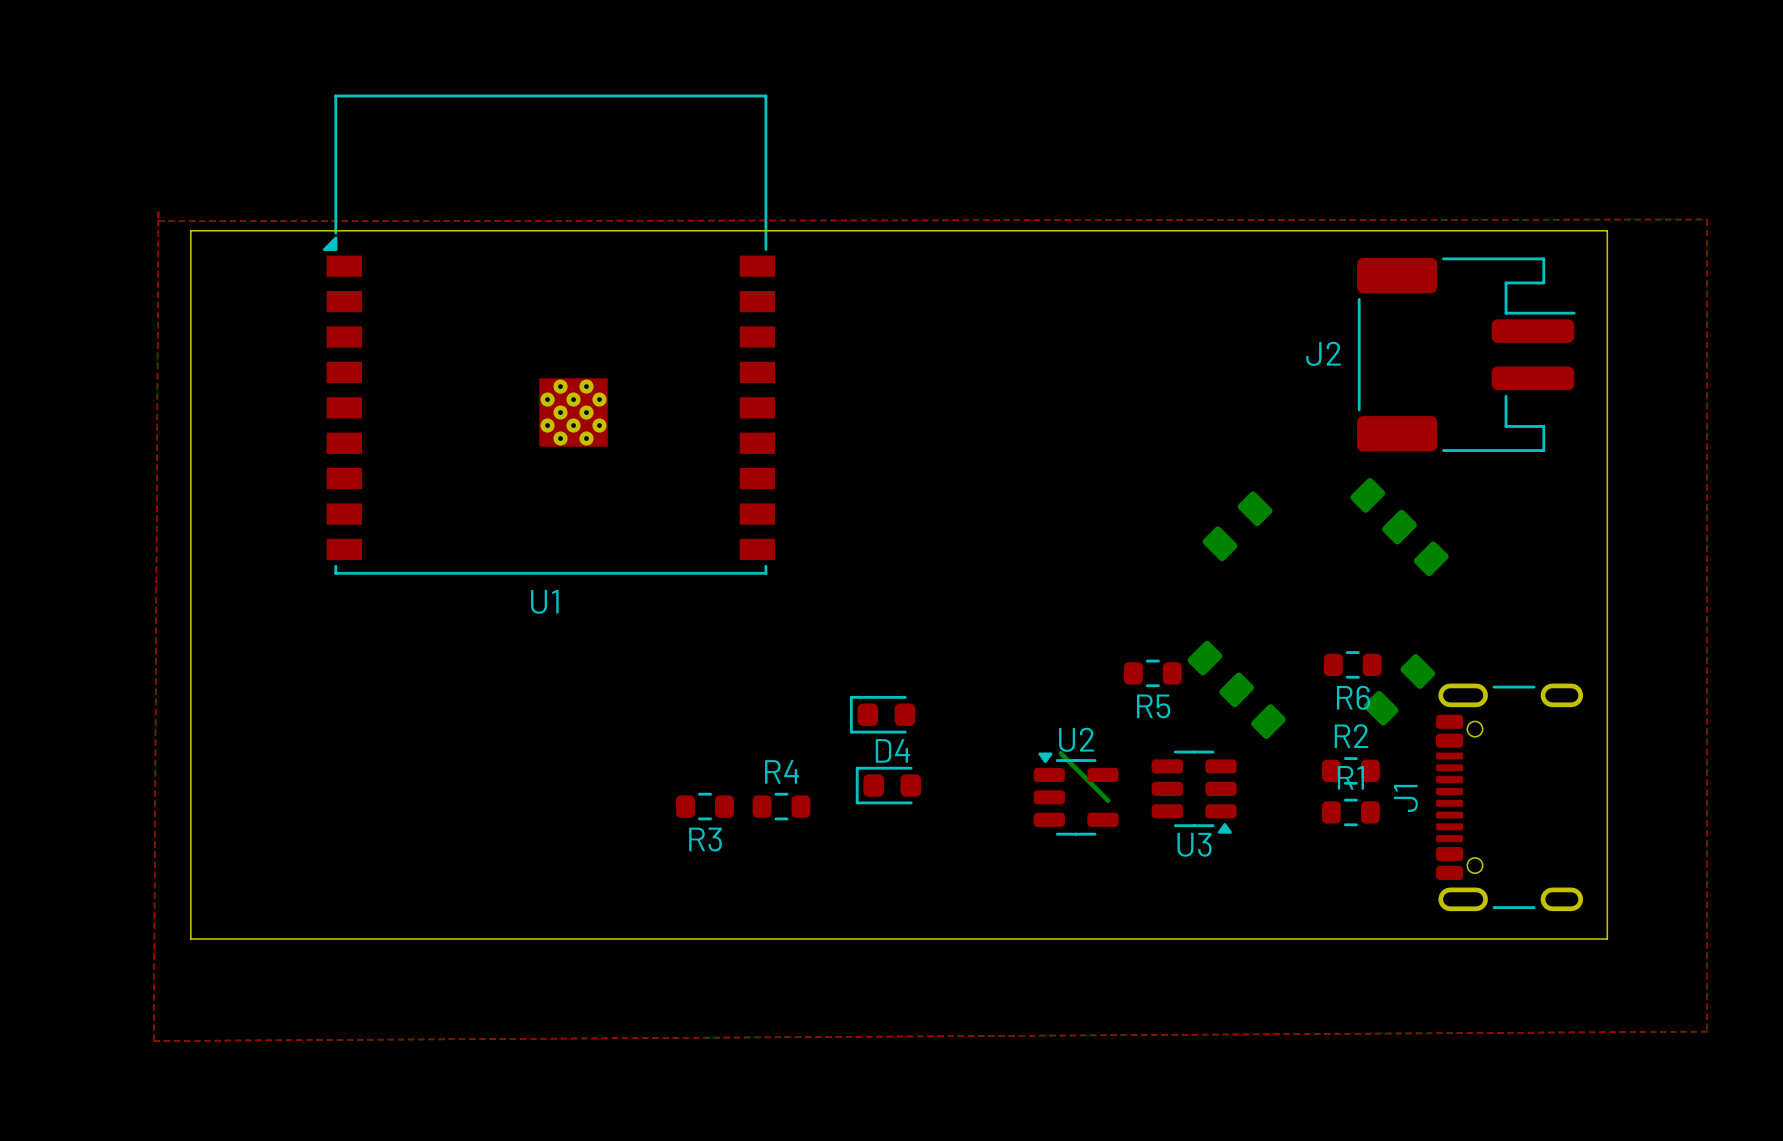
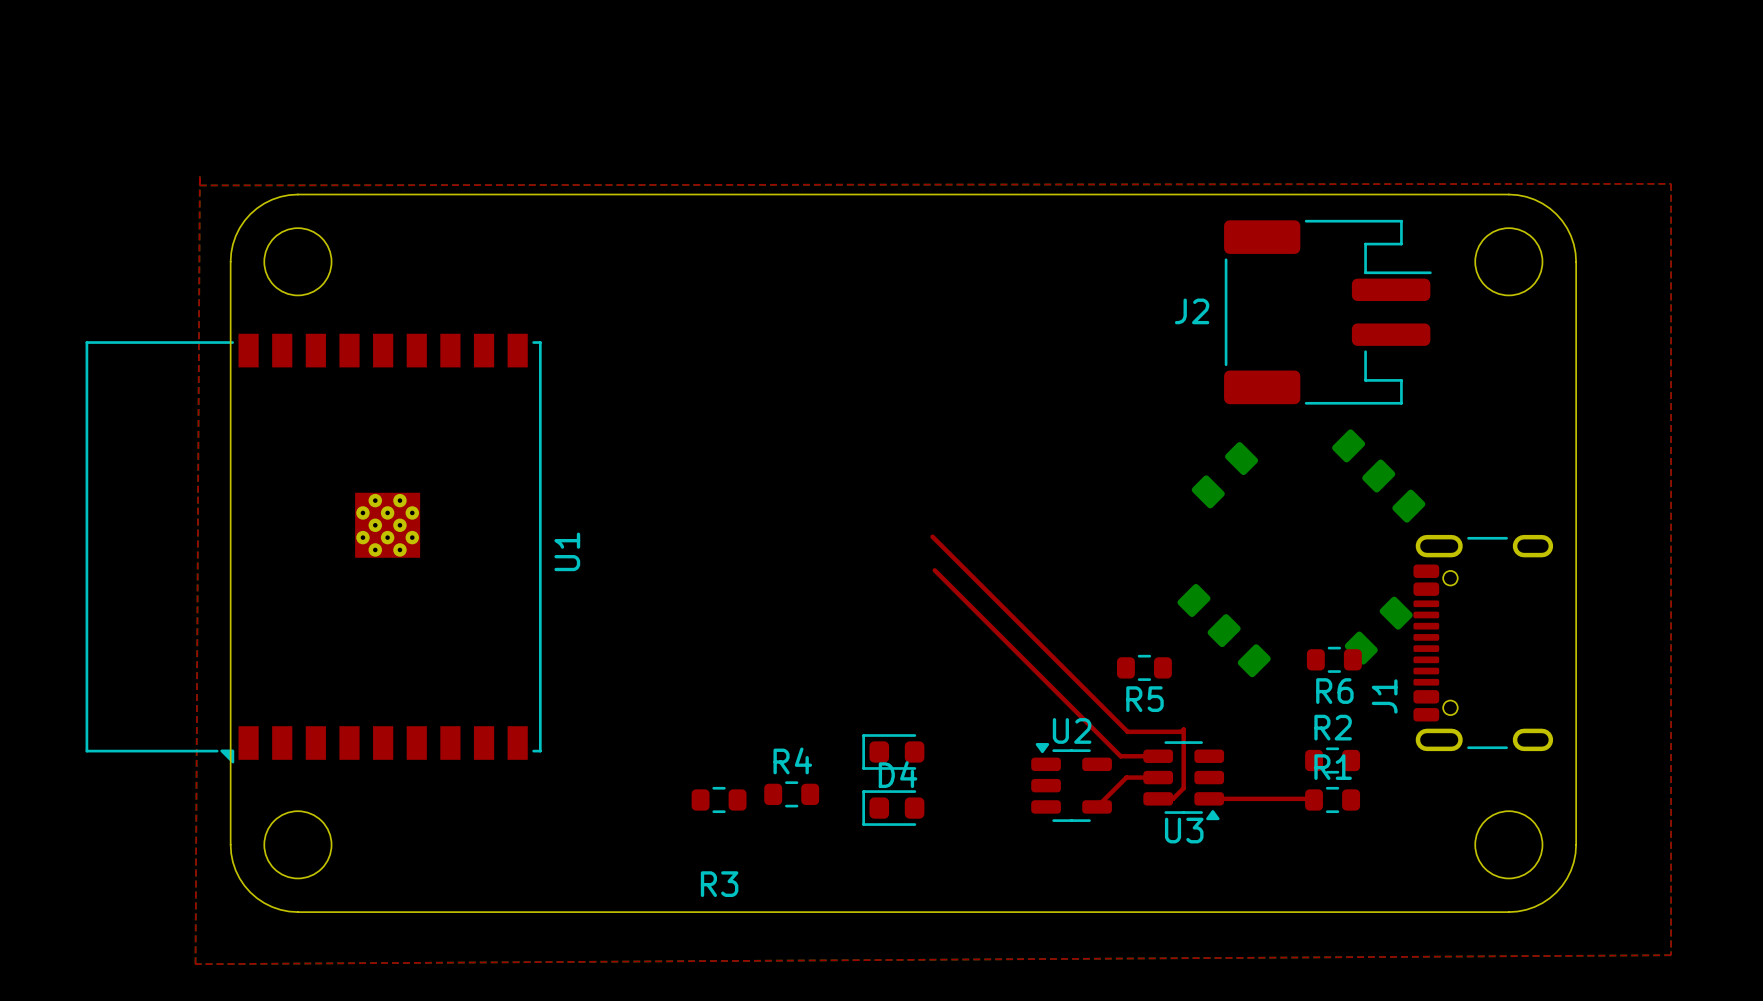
board edge: (261, 230) (190, 230) (190, 301) -> (297, 194) (272, 199) (250, 214) (235, 236) (230, 261)
board edge: (1536, 230) (1607, 230) (1607, 301) -> (1508, 194) (1534, 199) (1556, 214) (1571, 236) (1576, 261)
round board edge: none -> [263, 227, 333, 296]
round board edge: none -> [1474, 227, 1544, 296]
U1 rotation: 0° (548, 334) -> 90° counterclockwise (313, 548)
U1 position: (548, 334) -> (313, 548)
J2 position: (1466, 354) -> (1327, 312)
top track: none -> (932, 536) (1127, 731) (1181, 731) (1183, 729) (1183, 788) (1173, 798) (1158, 798)
top track: none -> (934, 570) (1120, 756) (1158, 756)
R6 position: (1352, 664) -> (1334, 659)
R5 position: (1152, 673) -> (1144, 667)
part position: (882, 714) -> (893, 751)
bottom track: (1060, 753) (1108, 800) -> none
R2 position: (1350, 770) -> (1332, 760)
D4 position: (888, 785) -> (893, 808)
U3 position: (1194, 792) -> (1183, 780)
U2 position: (1076, 794) -> (1071, 782)
J1 position: (1509, 797) -> (1483, 643)
J1 name position: J1 (1405, 798) -> J1 (1384, 696)
R3 position: (705, 806) -> (719, 799)
R4 position: (781, 806) -> (791, 794)
R1 position: (1350, 812) -> (1332, 799)
R3 name position: R3 (705, 839) -> R3 (719, 884)
top track: none -> (1158, 777) (1126, 777) (1097, 806)
top track: none -> (1209, 798) (1314, 799)
round board edge: none -> [263, 810, 333, 880]
round board edge: none -> [1474, 810, 1544, 880]
board edge: (190, 915) (190, 938) (1607, 938) (1607, 915) -> (230, 844) (235, 870) (250, 892) (272, 906) (297, 912) (1508, 912) (1534, 906) (1556, 892) (1571, 870) (1576, 844)

